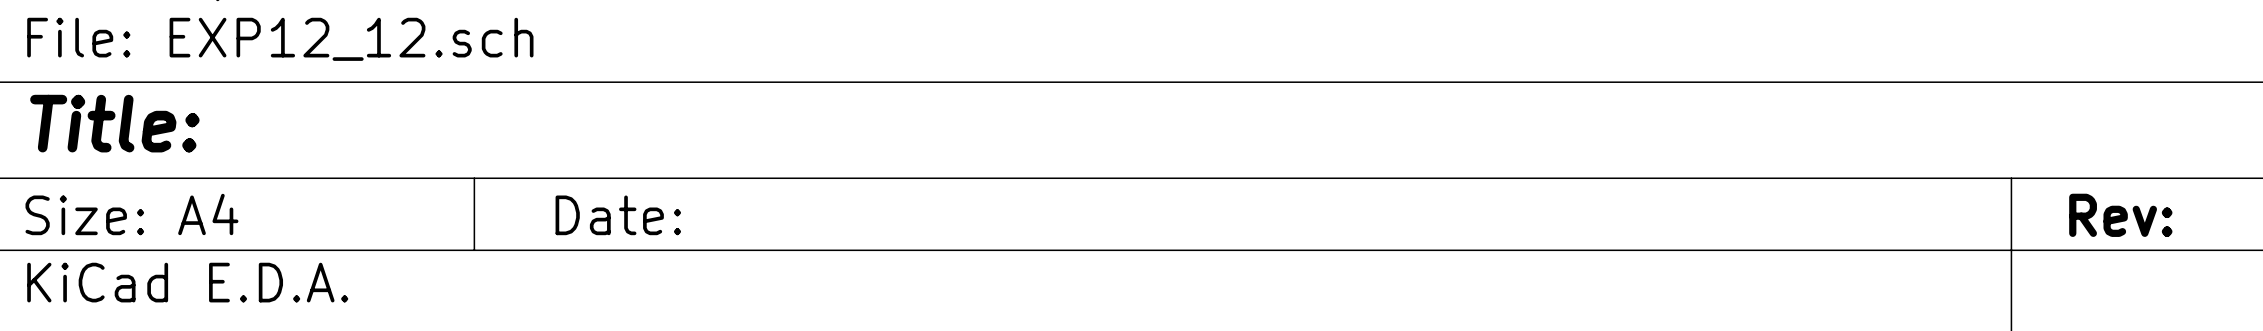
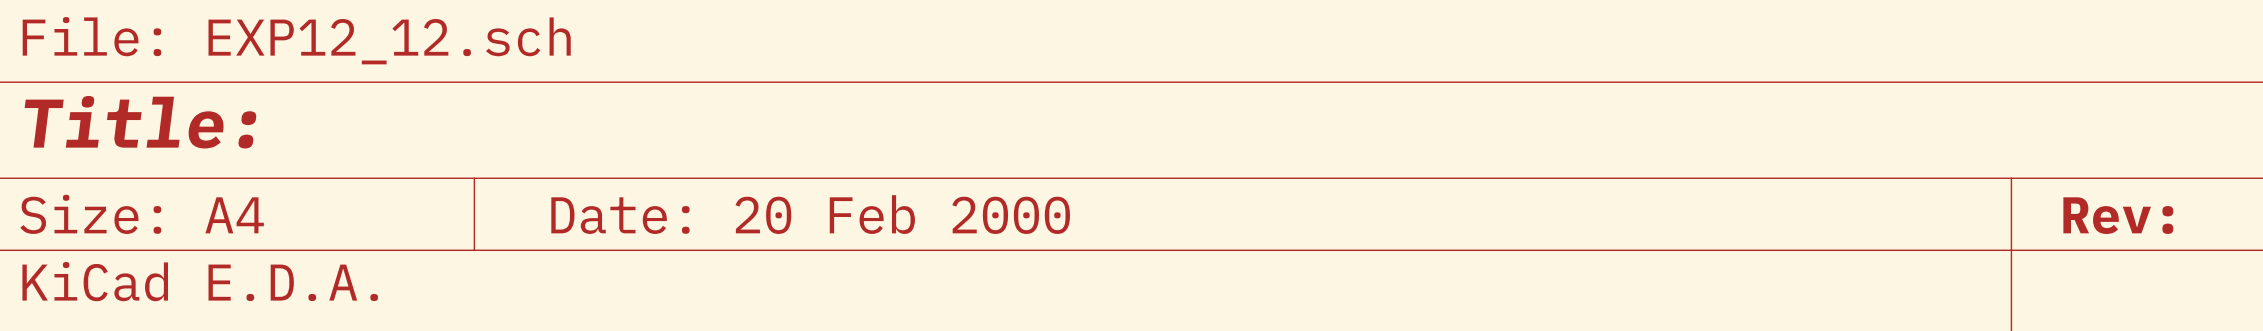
title block: Date: (618, 215) -> Date: 20 Feb 2000 (810, 214)

